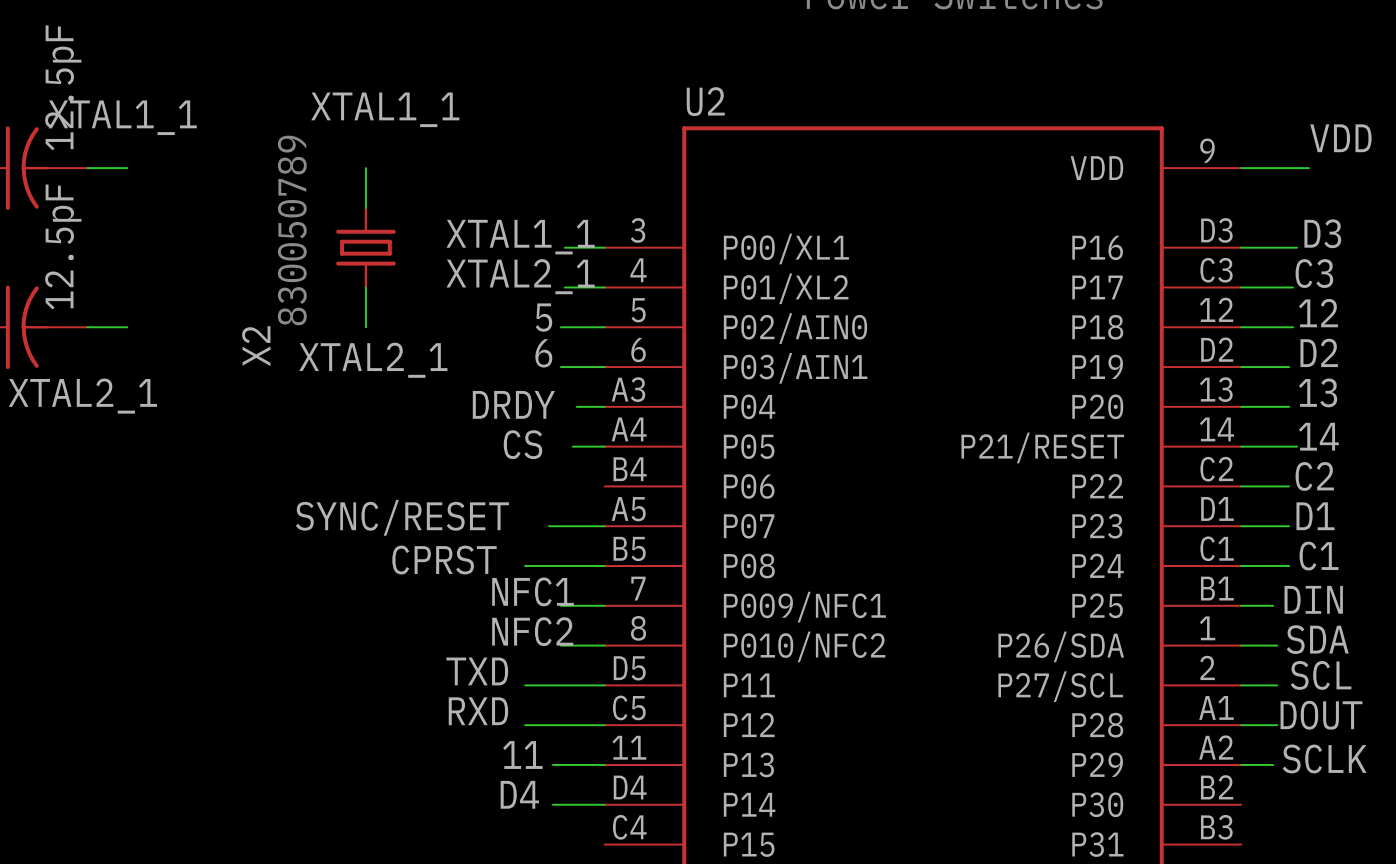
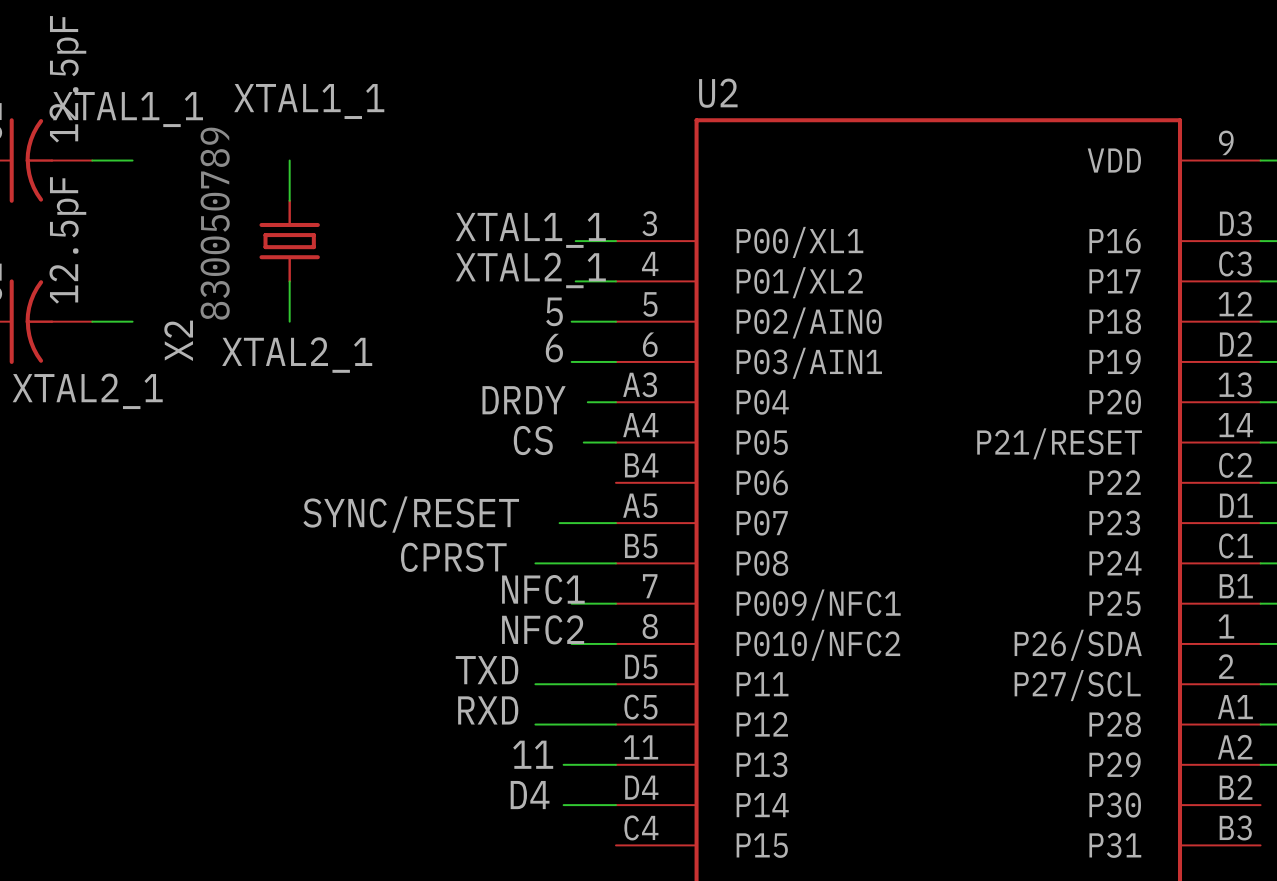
label position: XTAL1_1 (385, 109) -> XTAL1_1 (309, 101)
wire: (365, 168) (365, 207) -> (289, 160) (289, 200)
text position: 830050789 (292, 230) -> 830050789 (215, 223)
X2 position: (365, 247) -> (289, 241)
wire: (365, 287) (365, 327) -> (289, 281) (289, 321)
label position: XTAL2_1 (373, 360) -> XTAL2_1 (297, 355)

